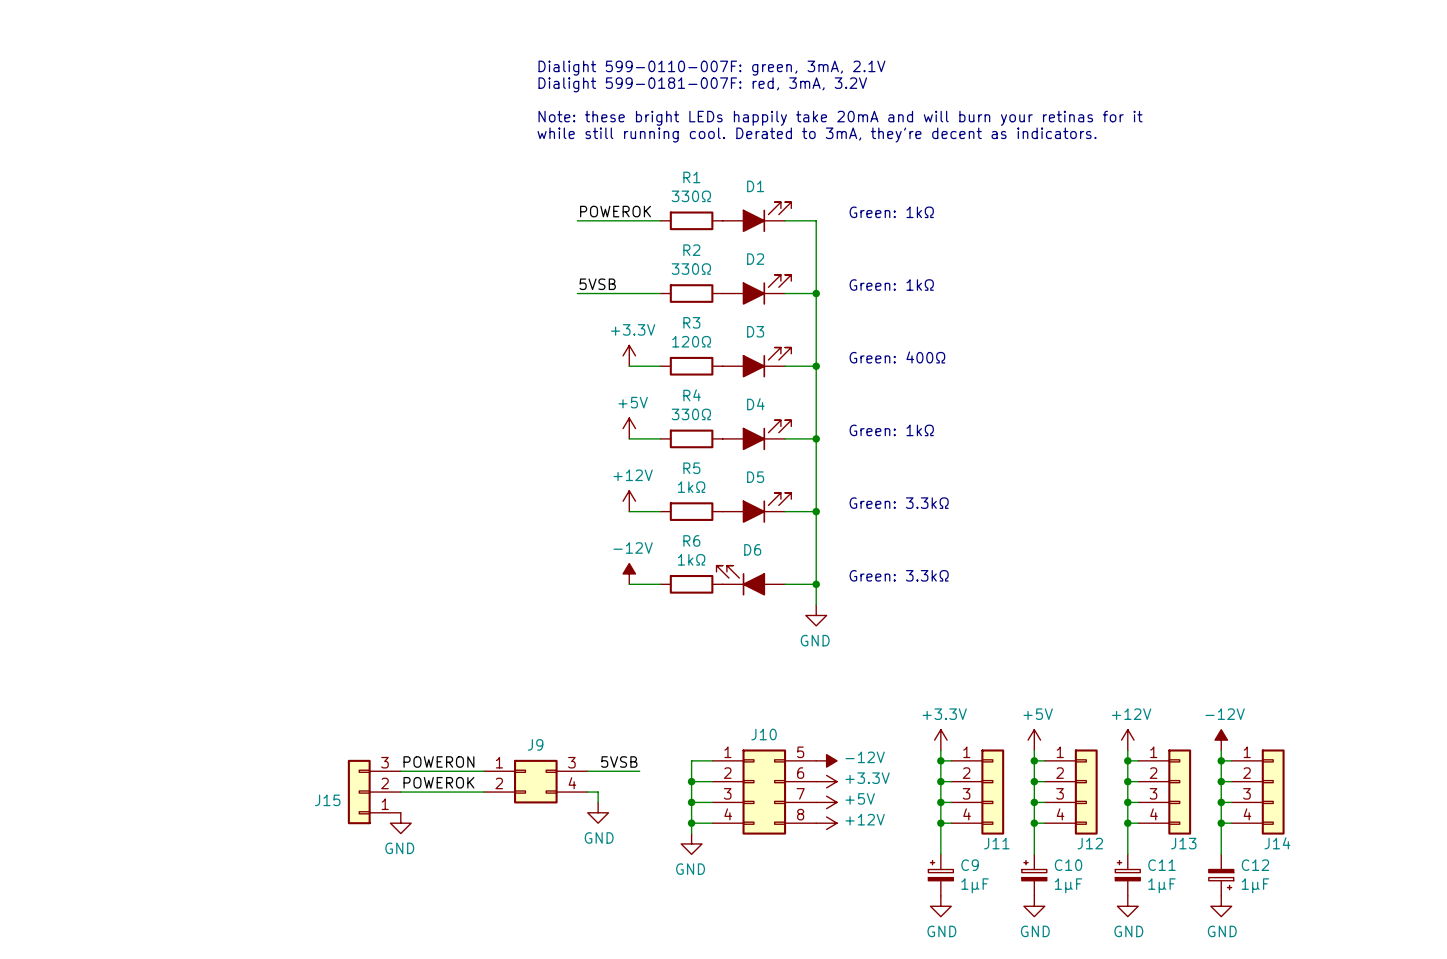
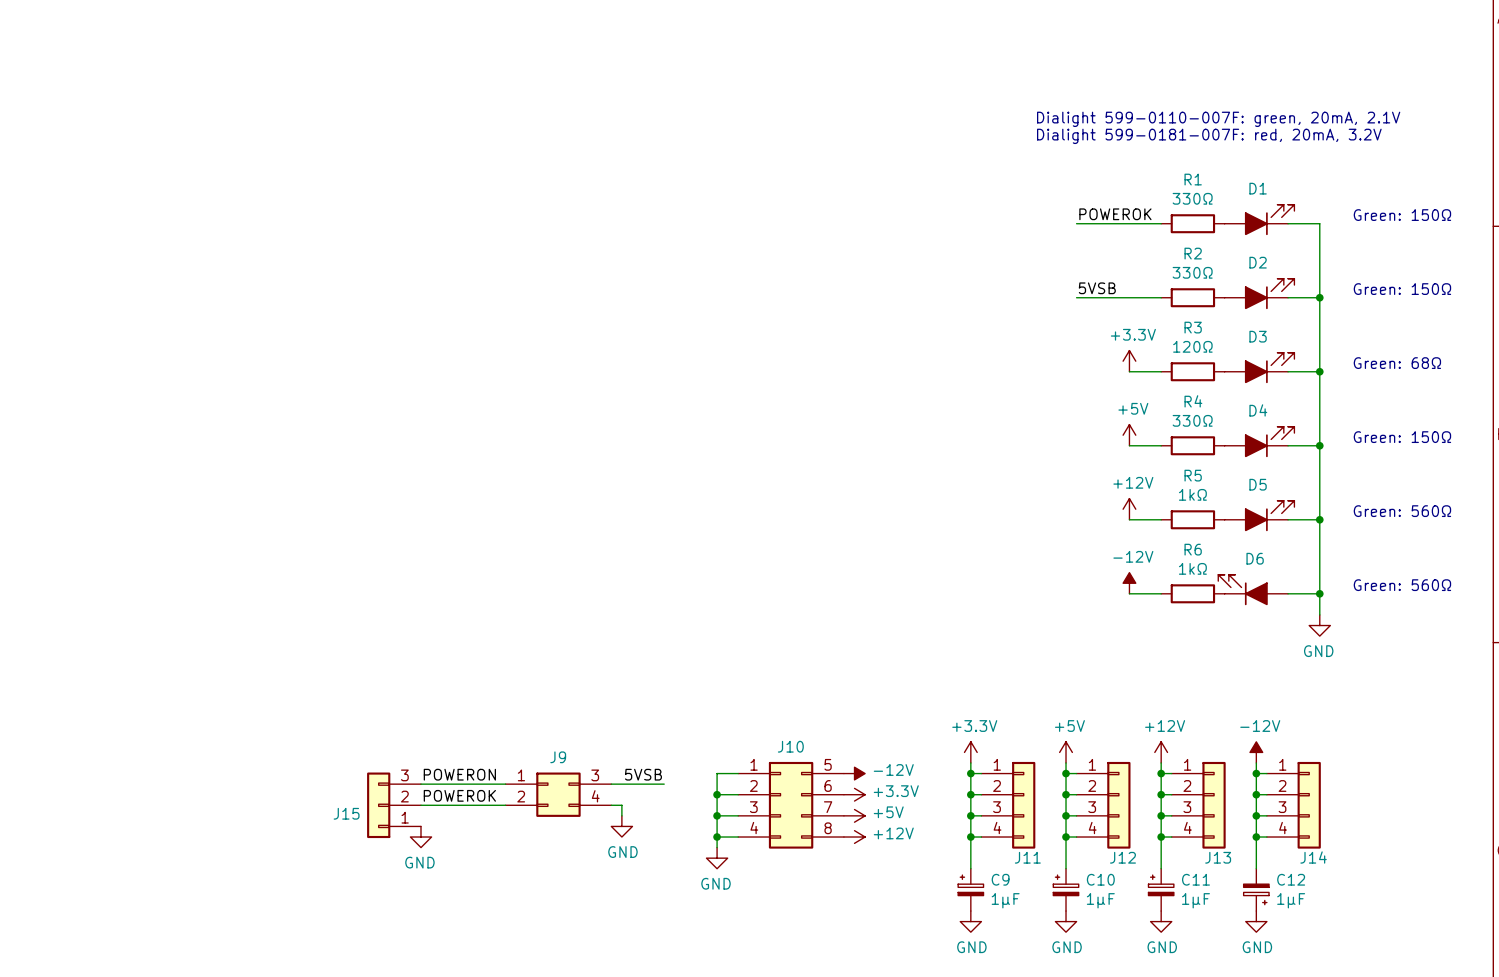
text: Dialight 599-0110-007F: green, 3mA, 2.1V (711, 68) -> none
text: Dialight 599-0181-007F: red, 3mA, 3.2V (702, 84) -> none
text: Note: these bright LEDs happily take 20mA and will burn your retinas for it (840, 118) -> none
text: none -> Dialight 599-0110-007F: green, 20mA, 2.1V (1218, 119)
text: while still running cool. Derated to 3mA, they're decent as indicators. (817, 135) -> none
text: none -> Dialight 599-0181-007F: red, 20mA, 3.2V (1209, 136)
label: POWEROK (615, 211) -> none
label: none -> POWEROK (1115, 214)
text: Green: 1kΩ (891, 212) -> none
text: none -> Green: 150Ω (1402, 215)
D1 position: (757, 217) -> (1259, 219)
wire: (577, 220) (660, 220) -> none
R1 position: (691, 220) -> (1192, 223)
wire: (785, 220) (816, 220) (816, 605) -> none
wire: none -> (1076, 223) (1161, 223)
wire: none -> (1288, 223) (1319, 223) (1319, 614)
label: 5VSB (597, 284) -> none
label: none -> 5VSB (1097, 288)
text: Green: 1kΩ (891, 285) -> none
text: none -> Green: 150Ω (1402, 289)
D2 position: (757, 289) -> (1259, 293)
wire: (577, 293) (660, 293) -> none
R2 position: (691, 293) -> (1192, 297)
wire: (785, 293) (816, 293) -> none
junction: (816, 293) -> none
wire: none -> (1076, 297) (1161, 297)
wire: none -> (1288, 297) (1319, 297)
junction: none -> (1319, 297)
power symbol: +3.3V (629, 355) -> none
power symbol: none -> +3.3V (1129, 361)
text: Green: 400Ω (897, 357) -> none
text: none -> Green: 68Ω (1397, 363)
D3 position: (757, 362) -> (1259, 367)
wire: (629, 366) (660, 366) -> none
R3 position: (691, 366) -> (1192, 371)
wire: (785, 366) (816, 366) -> none
junction: (816, 366) -> none
wire: none -> (1129, 371) (1161, 371)
wire: none -> (1288, 371) (1319, 371)
junction: none -> (1319, 371)
power symbol: +5V (629, 428) -> none
power symbol: none -> +5V (1129, 435)
text: Green: 1kΩ (891, 430) -> none
text: none -> Green: 150Ω (1402, 437)
D4 position: (757, 435) -> (1259, 441)
wire: (629, 438) (660, 438) -> none
R4 position: (691, 438) -> (1192, 445)
wire: (785, 438) (816, 438) -> none
junction: (816, 438) -> none
wire: none -> (1129, 445) (1161, 445)
wire: none -> (1288, 445) (1319, 445)
junction: none -> (1319, 445)
power symbol: +12V (629, 501) -> none
power symbol: none -> +12V (1129, 509)
text: Green: 3.3kΩ (899, 503) -> none
text: none -> Green: 560Ω (1402, 511)
D5 position: (757, 507) -> (1259, 515)
wire: (629, 511) (660, 511) -> none
R5 position: (691, 511) -> (1192, 519)
wire: (785, 511) (816, 511) -> none
junction: (816, 511) -> none
wire: none -> (1129, 519) (1161, 519)
wire: none -> (1288, 519) (1319, 519)
junction: none -> (1319, 519)
power symbol: -12V (629, 573) -> none
power symbol: none -> -12V (1129, 583)
text: Green: 3.3kΩ (899, 575) -> none
text: none -> Green: 560Ω (1402, 585)
D6 position: (750, 580) -> (1253, 590)
wire: (629, 584) (660, 584) -> none
R6 position: (691, 584) -> (1192, 593)
wire: (785, 584) (816, 584) -> none
junction: (816, 584) -> none
wire: none -> (1129, 593) (1161, 593)
wire: none -> (1288, 593) (1319, 593)
junction: none -> (1319, 593)
power symbol: GND (816, 615) -> none
power symbol: none -> GND (1319, 625)

